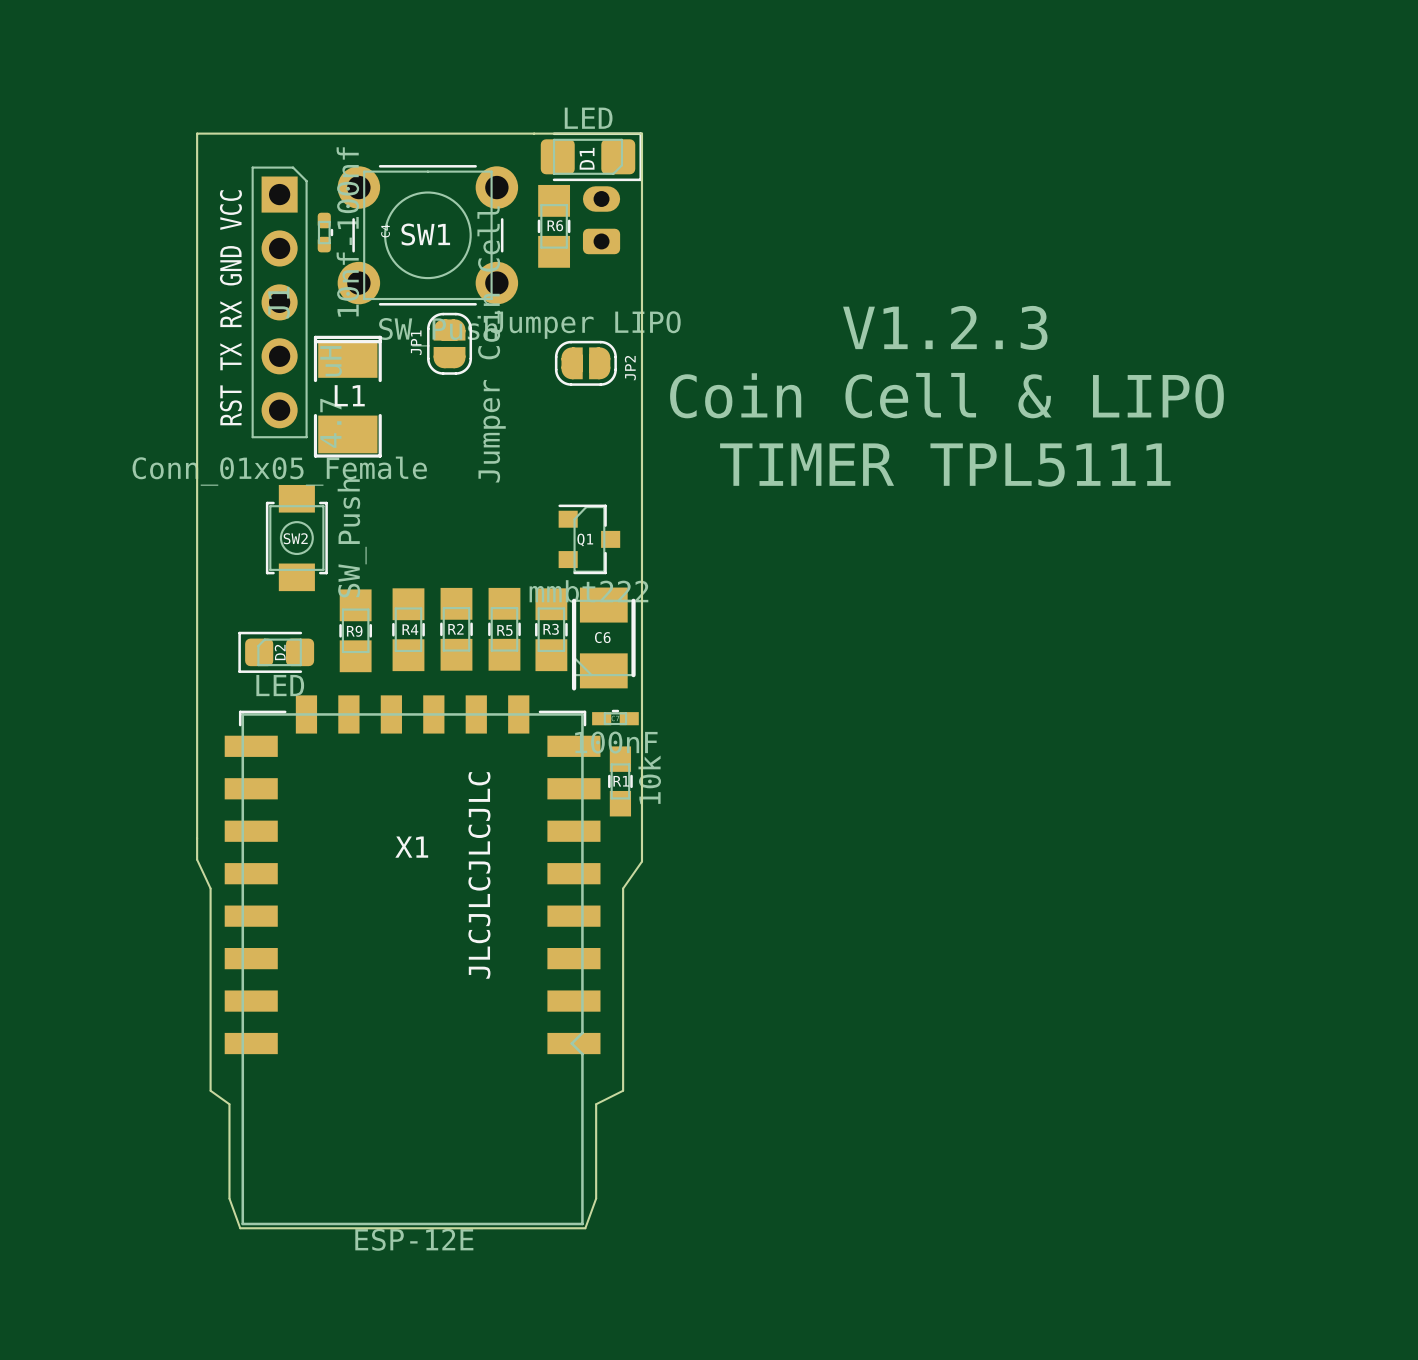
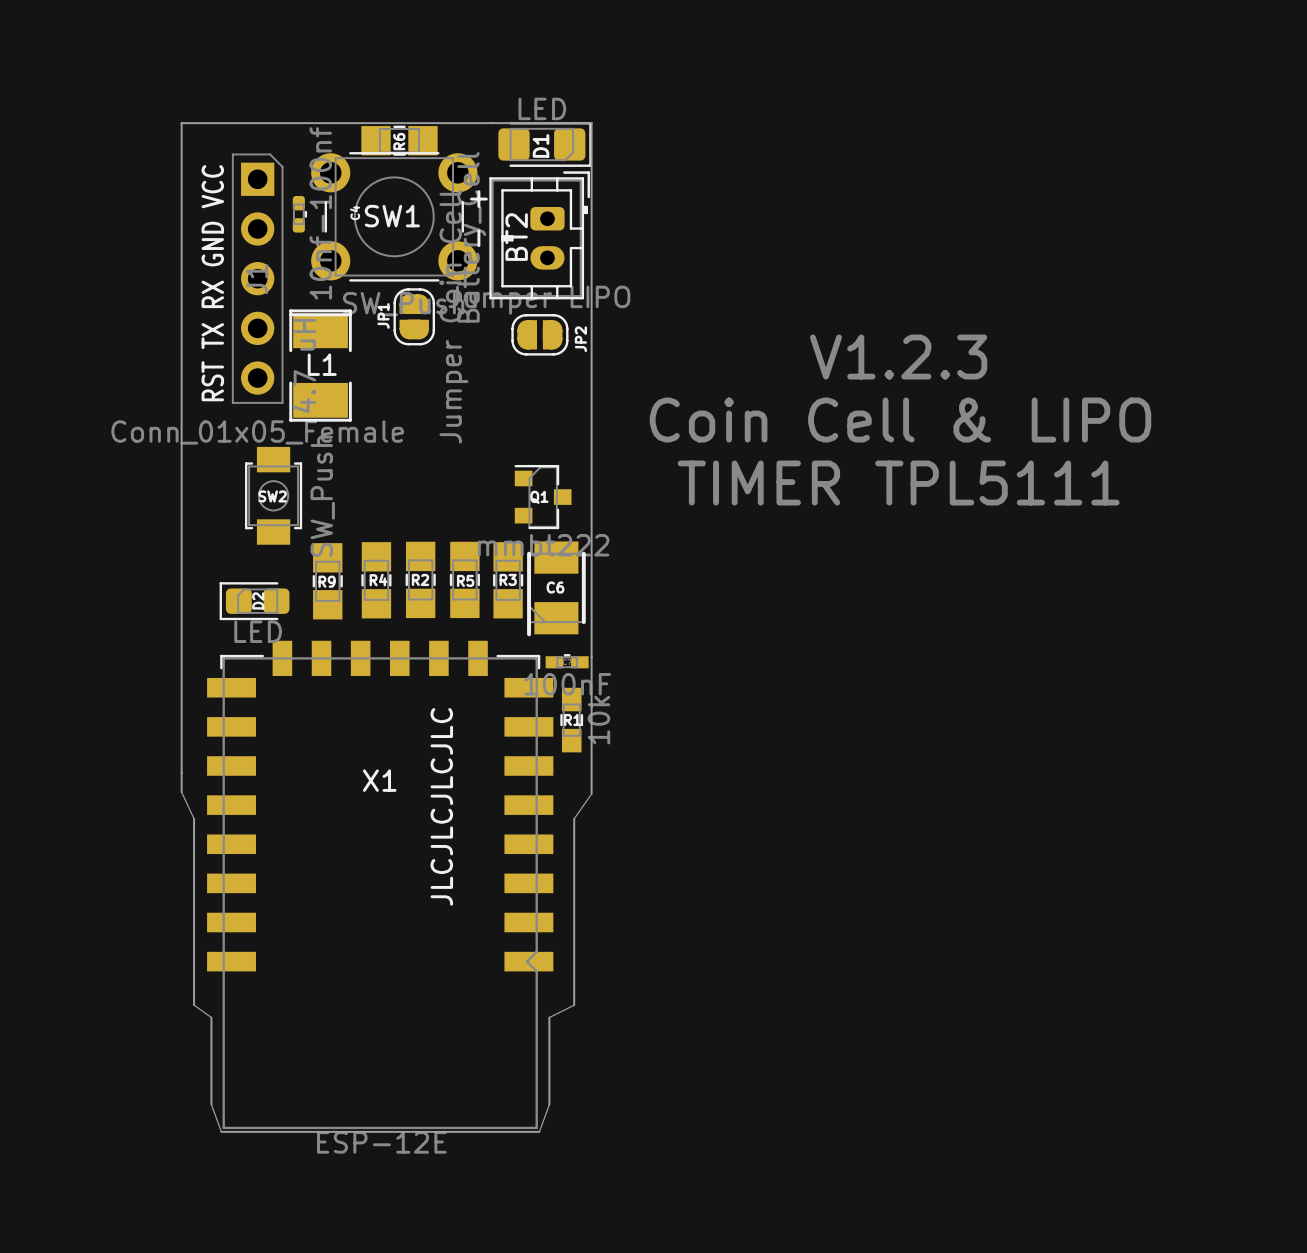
BT2 side: bottom (601, 220) -> top (539, 235)
R6 rotation: 0° (554, 226) -> 90° clockwise (399, 140)
R6 position: (554, 226) -> (399, 140)
text: none -> - + (478, 218)
text position: V1.2.3 (945, 327) -> V1.2.3 (898, 357)
text position: Coin Cell & LIPO (946, 395) -> Coin Cell & LIPO (900, 420)
text position: TIMER TPL5111 (945, 465) -> TIMER TPL5111 (898, 483)

